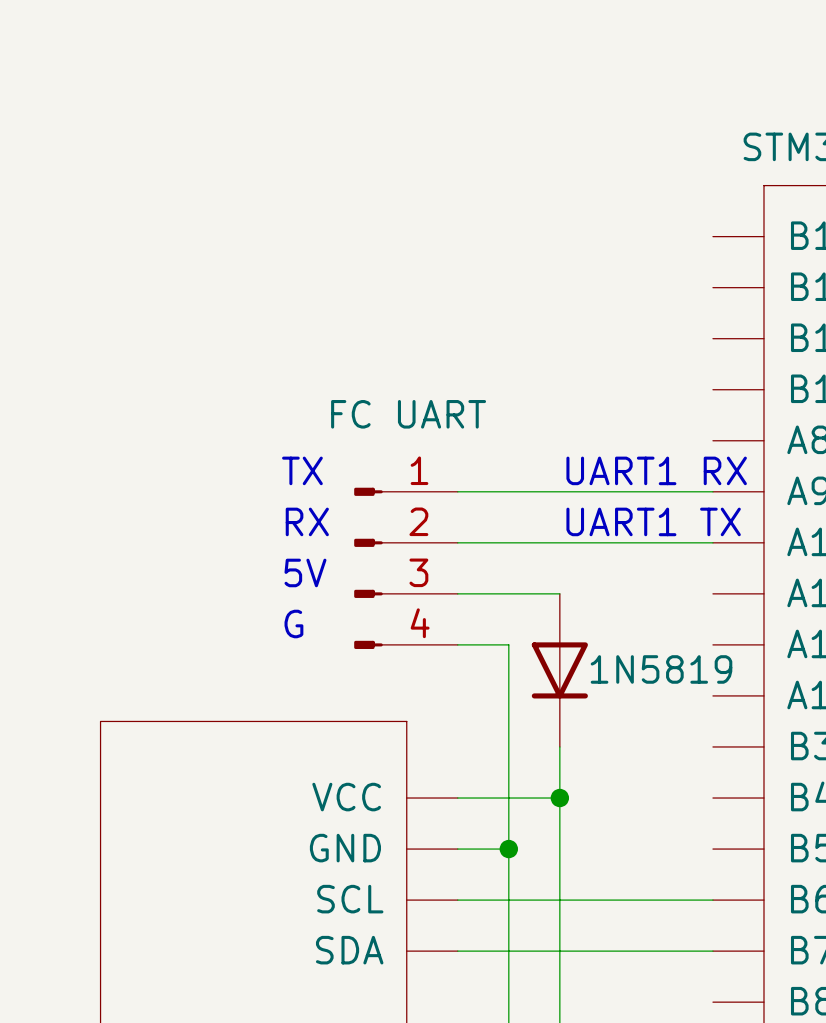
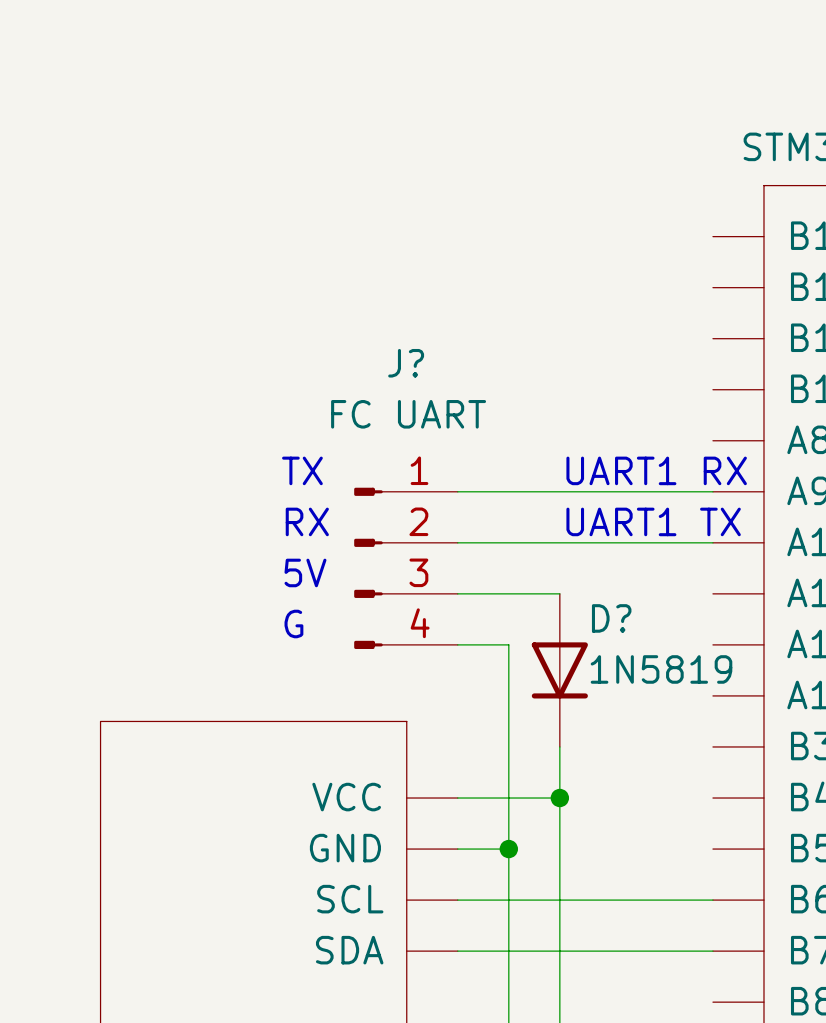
J? name: none -> J? (406, 363)
D? name: none -> D? (611, 618)

